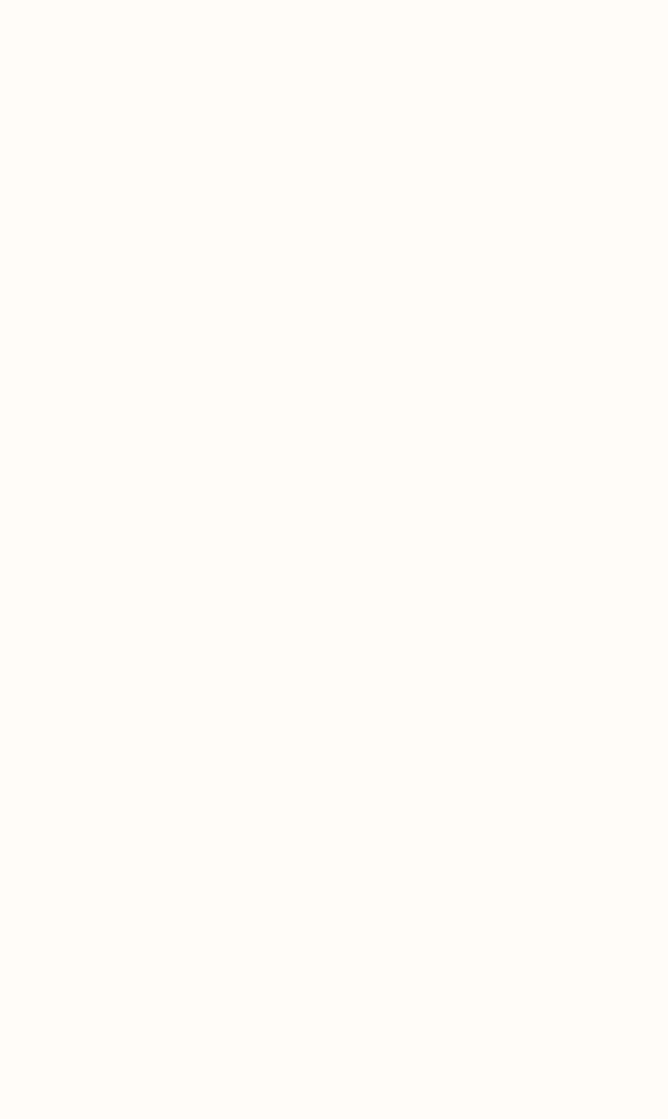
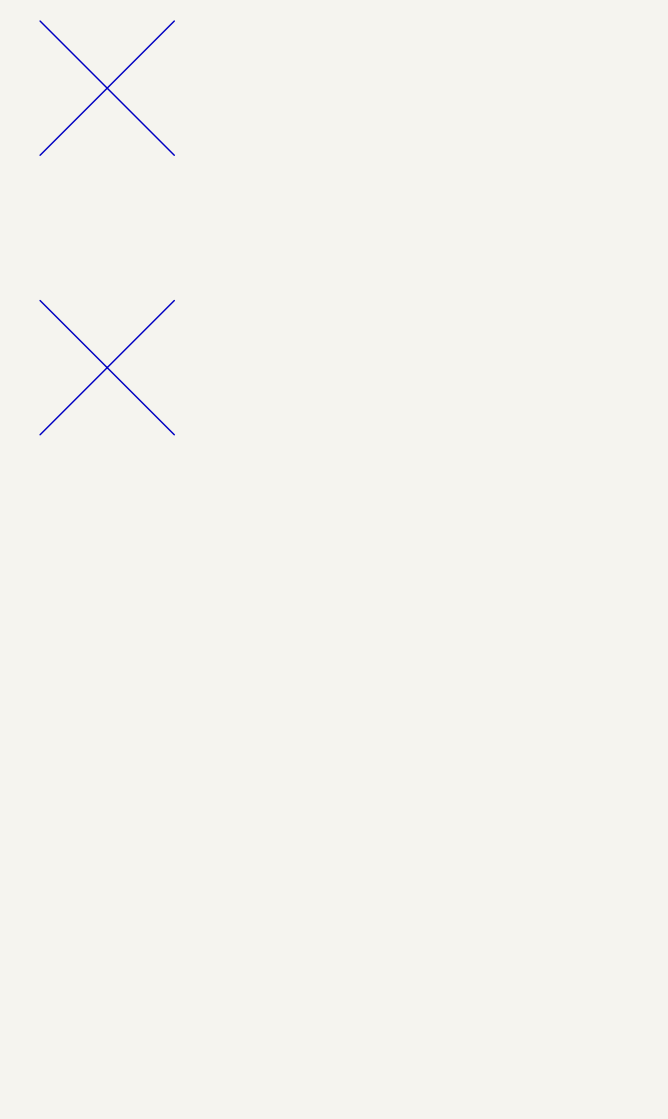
no-connect mark: none -> (107, 88)
no-connect mark: none -> (107, 367)

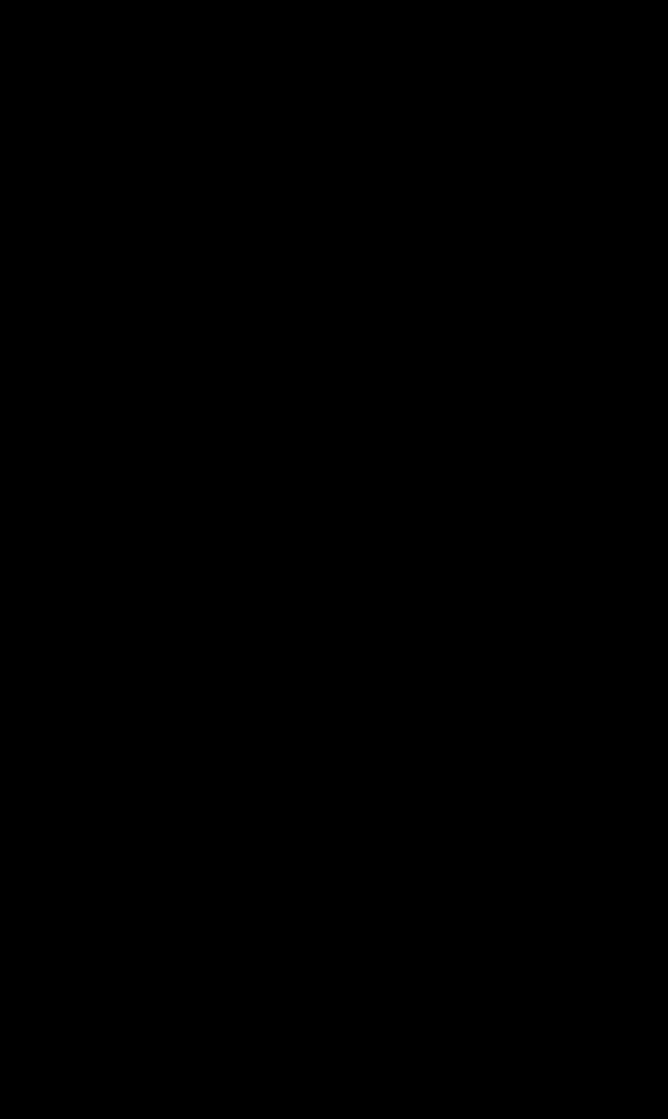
no-connect mark: (107, 88) -> none
no-connect mark: (107, 367) -> none

